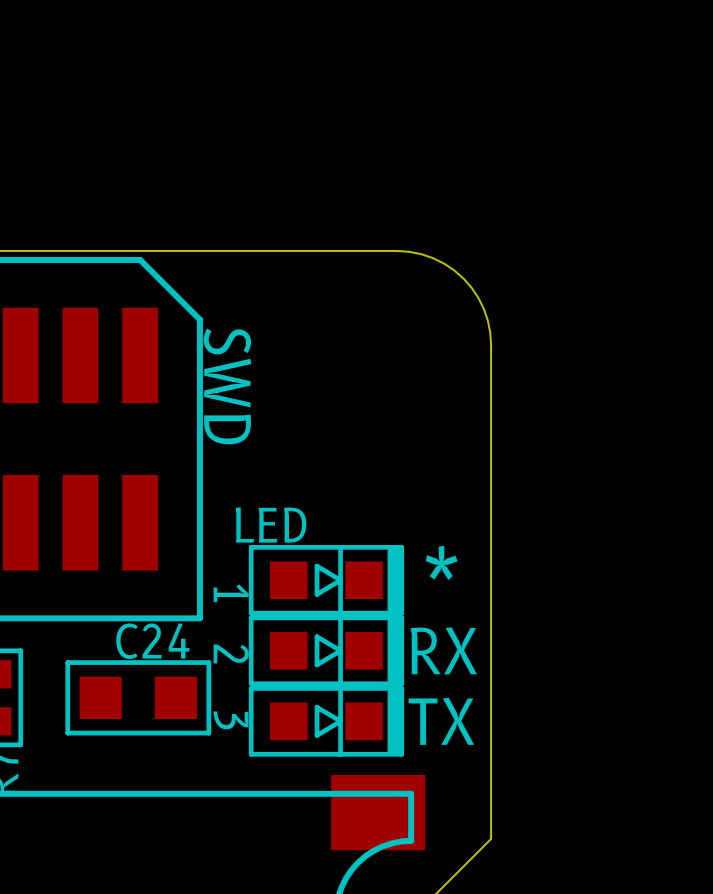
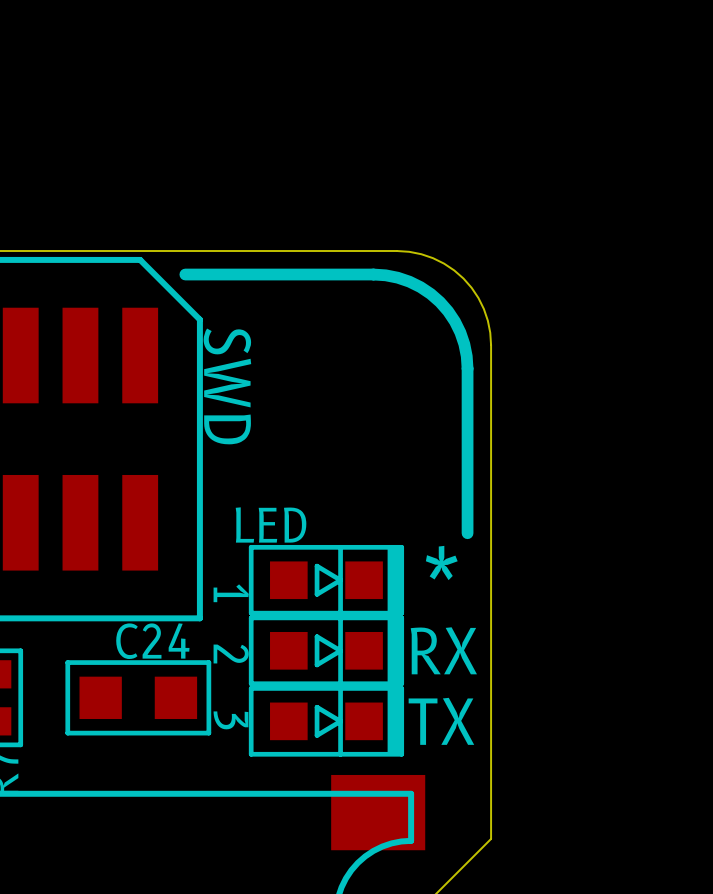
line: none -> (185, 274) (385, 275) (409, 281) (420, 287) (440, 302) (454, 321) (460, 332) (466, 356) (467, 533)

